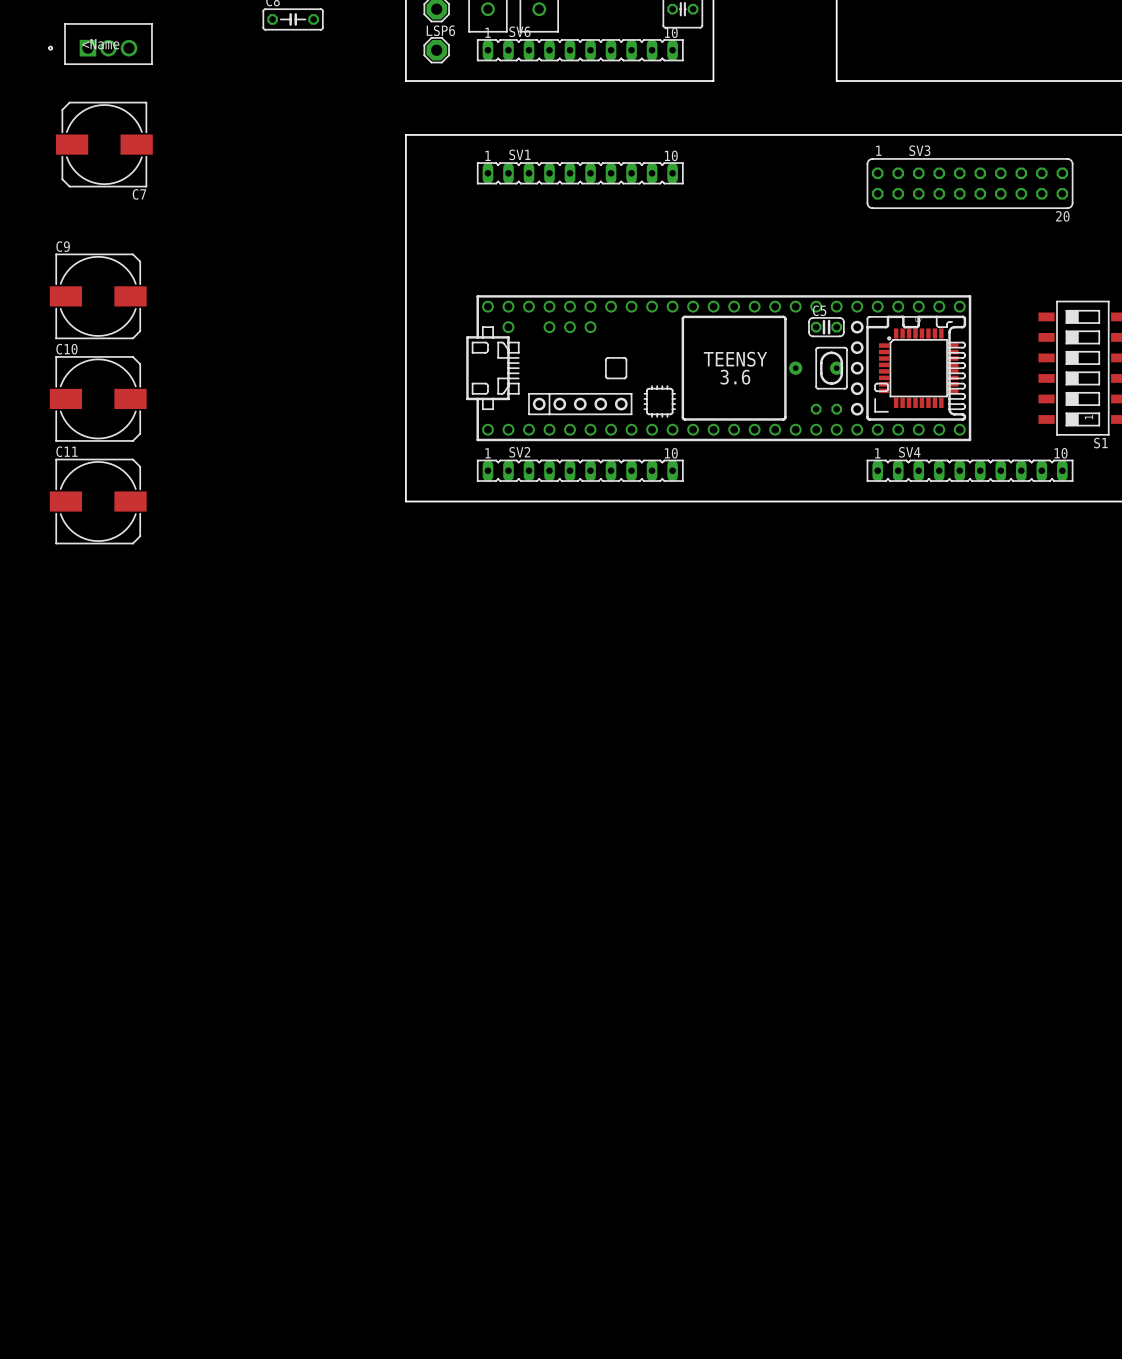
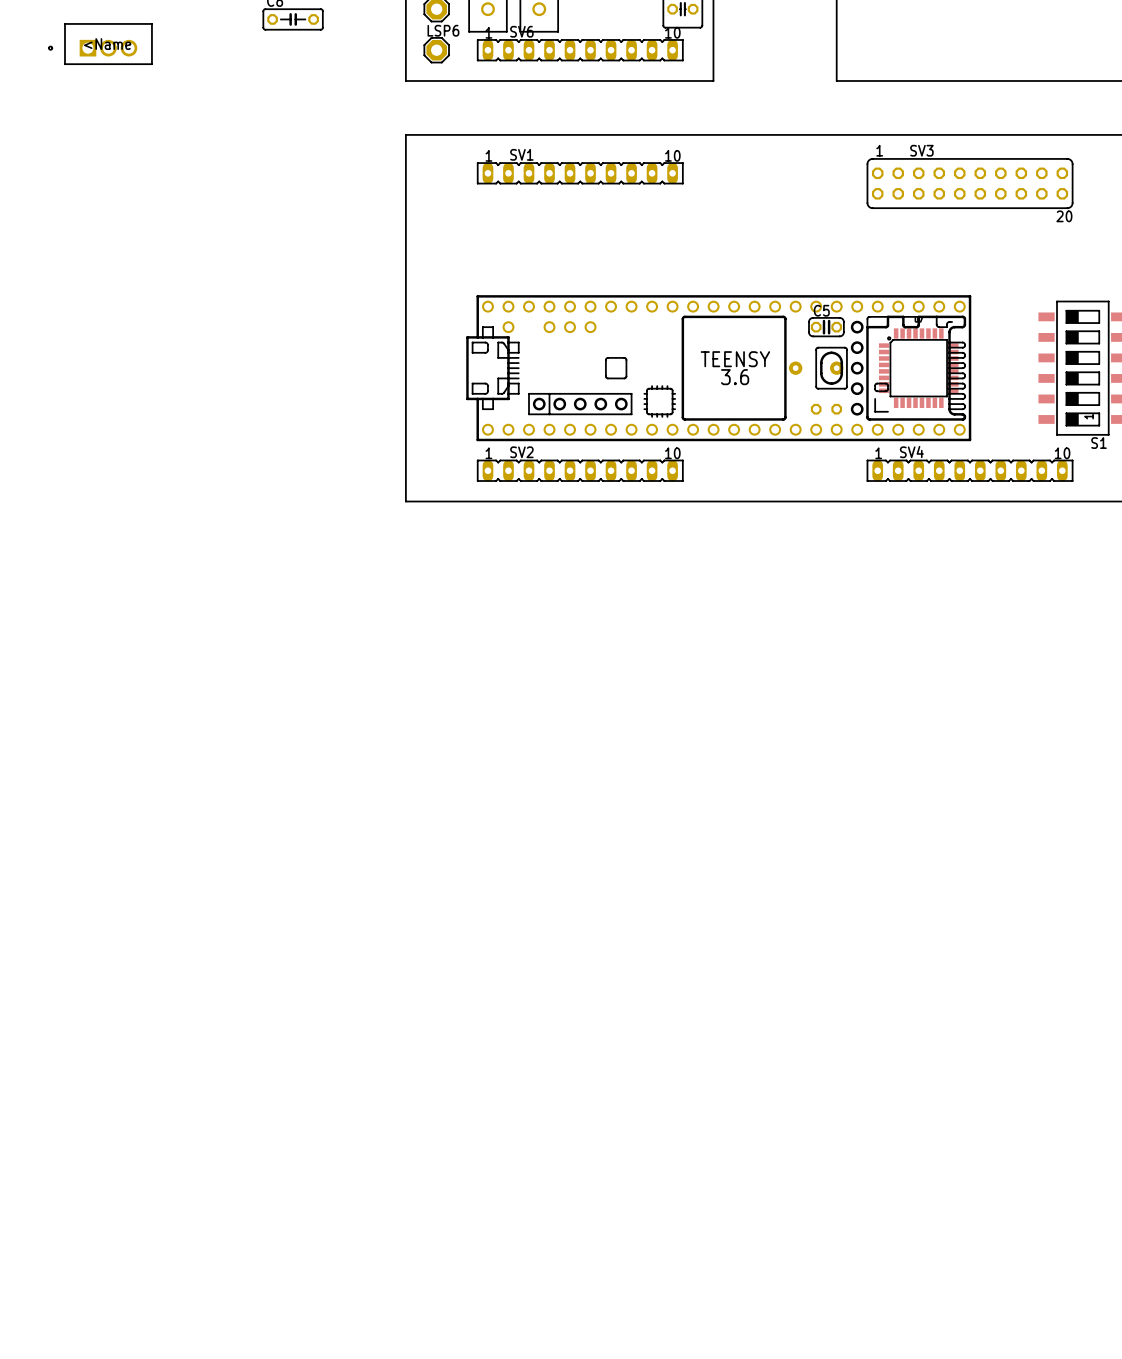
C7: (104, 144) -> none
C9: (98, 296) -> none
C10: (98, 398) -> none
C11: (98, 501) -> none

